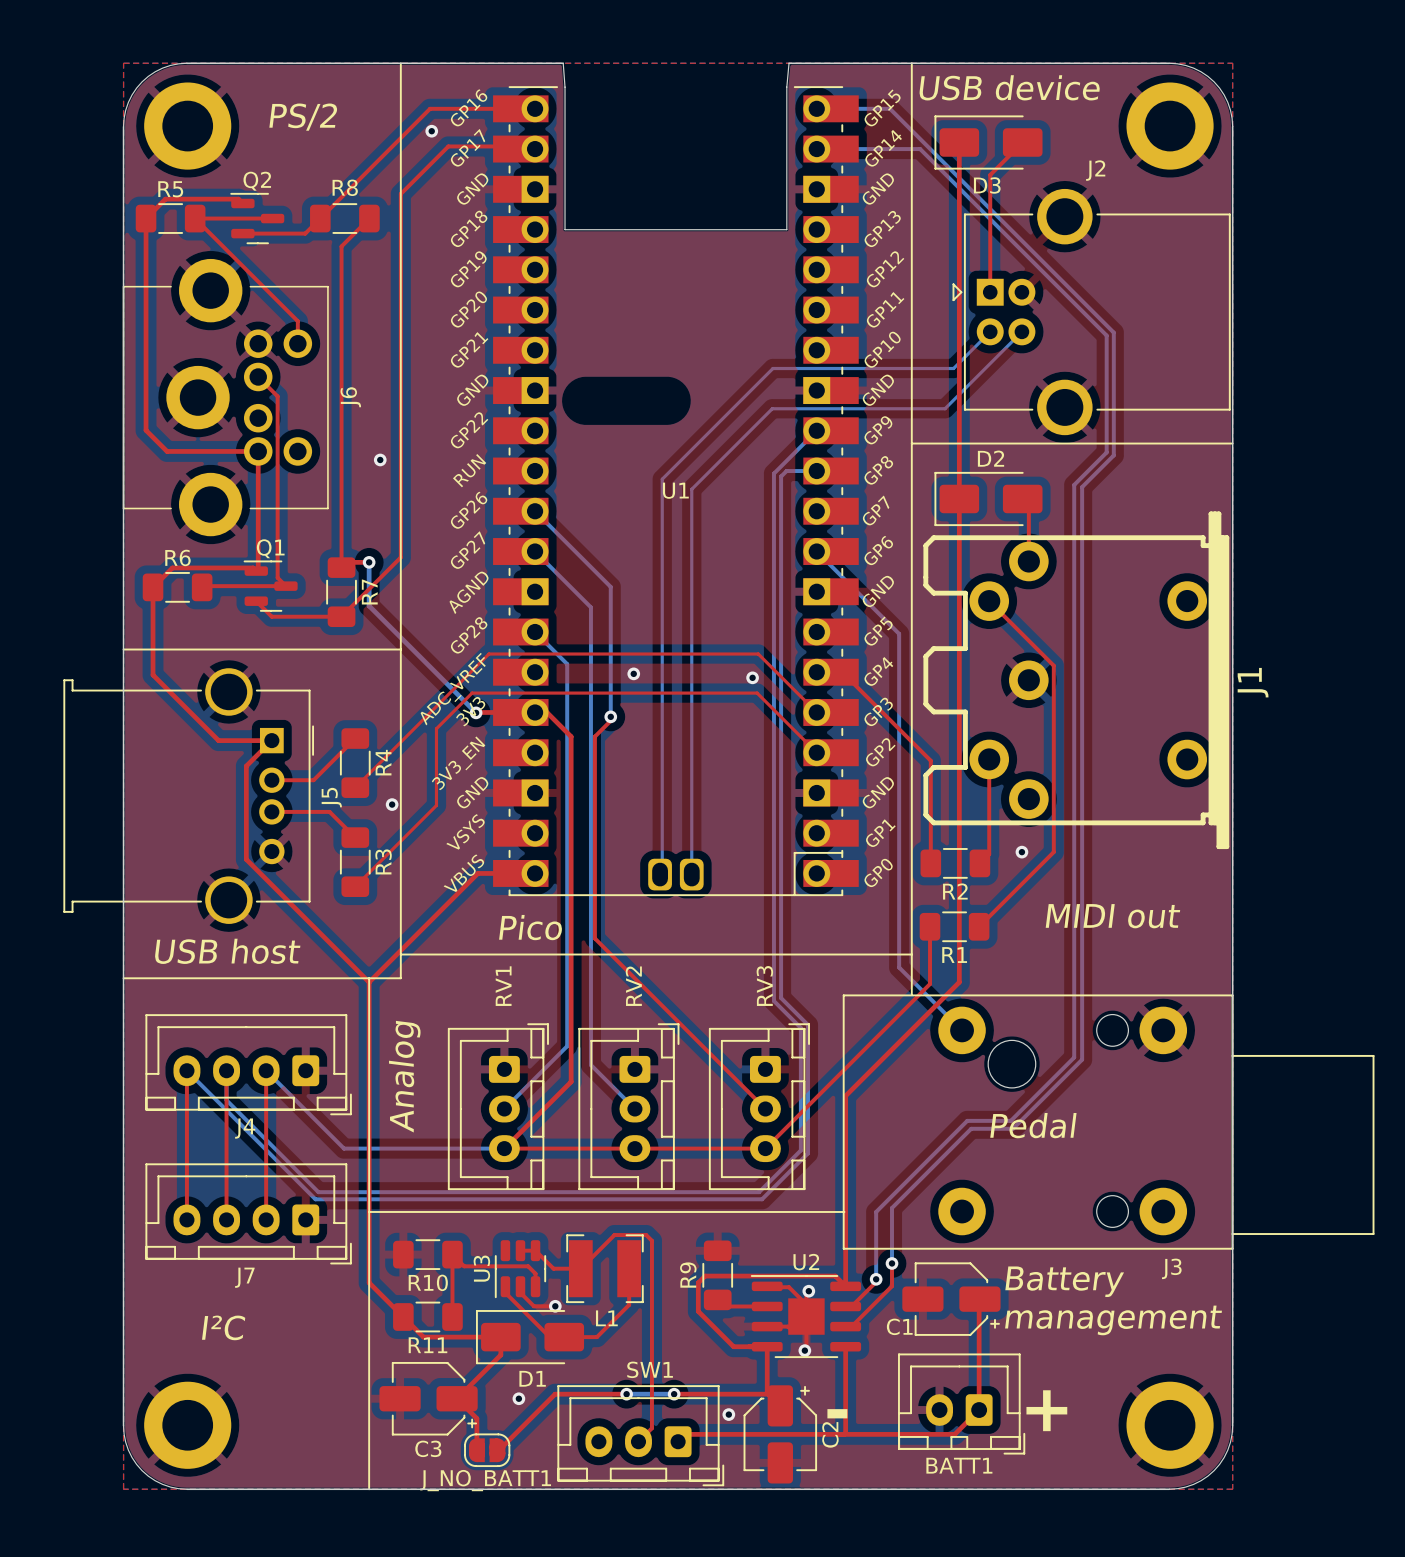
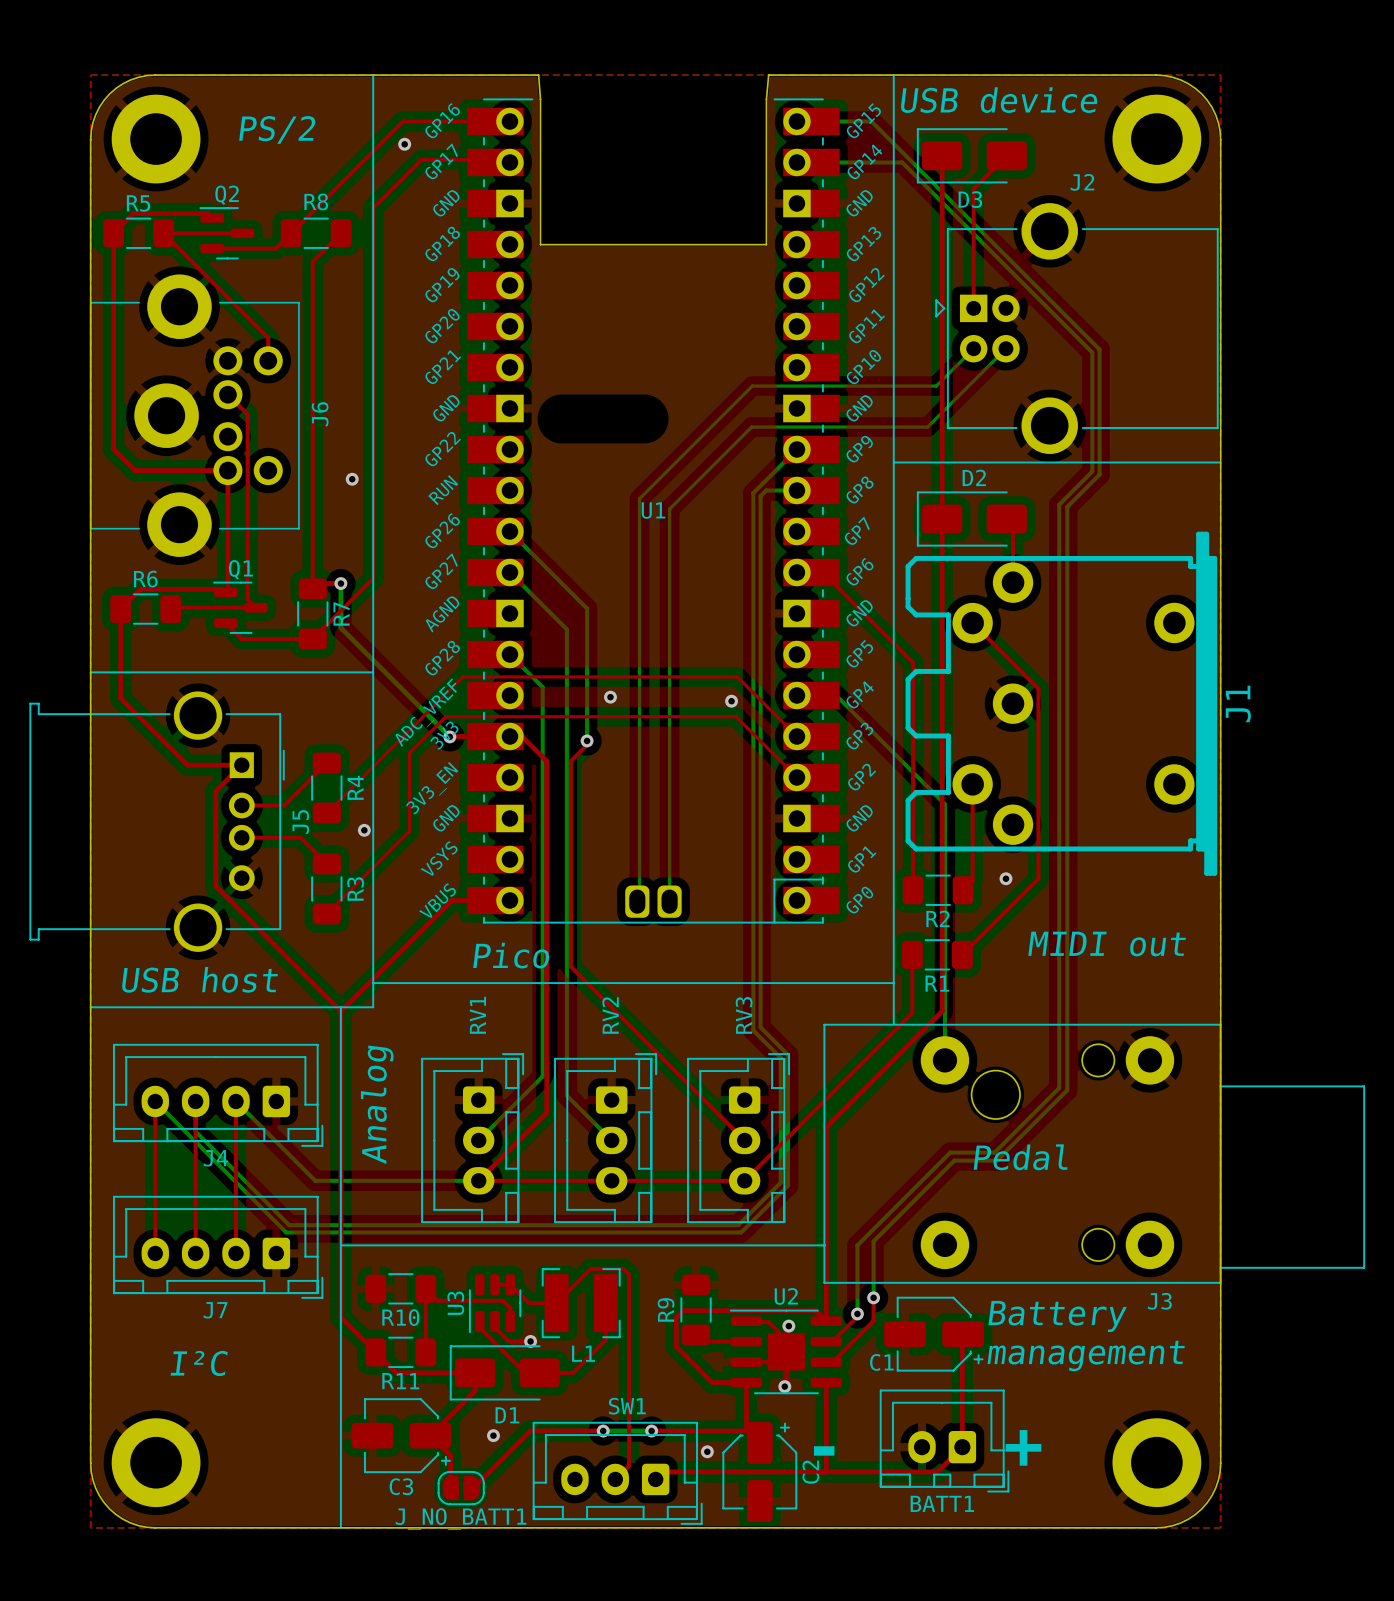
bottom track: (816, 551) (899, 633) (899, 967) (962, 1030) -> (796, 695) (836, 695) (944, 804) (944, 1060)
top track: (816, 672) (842, 672) (930, 760) -> (822, 572) (913, 662) (913, 785)

